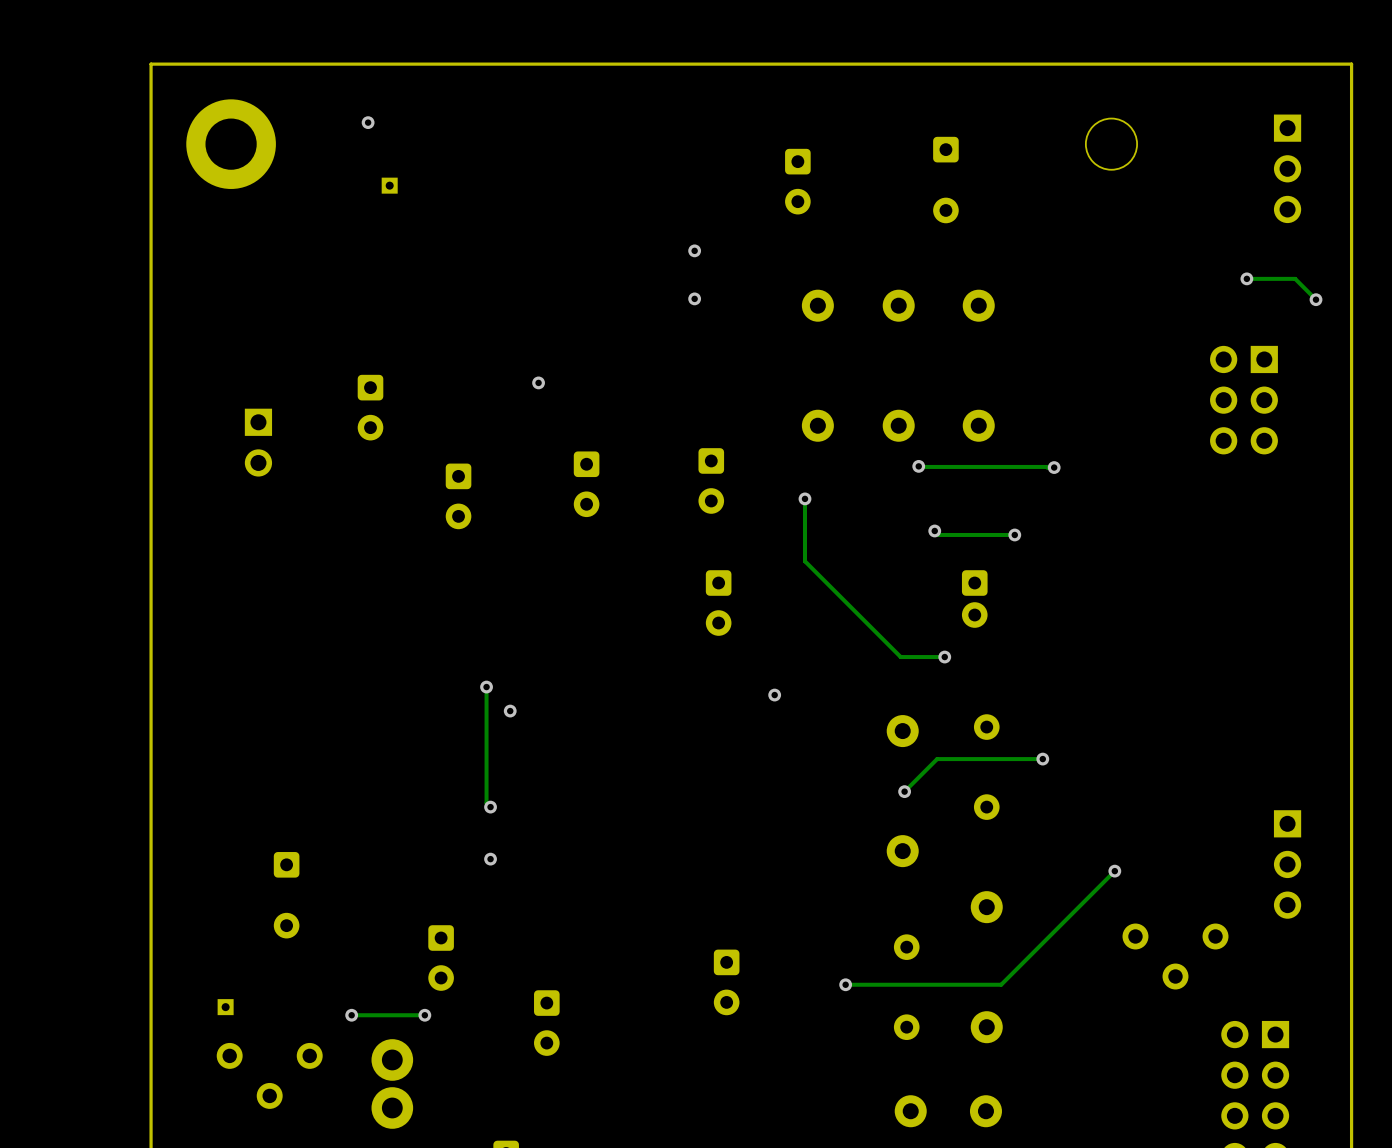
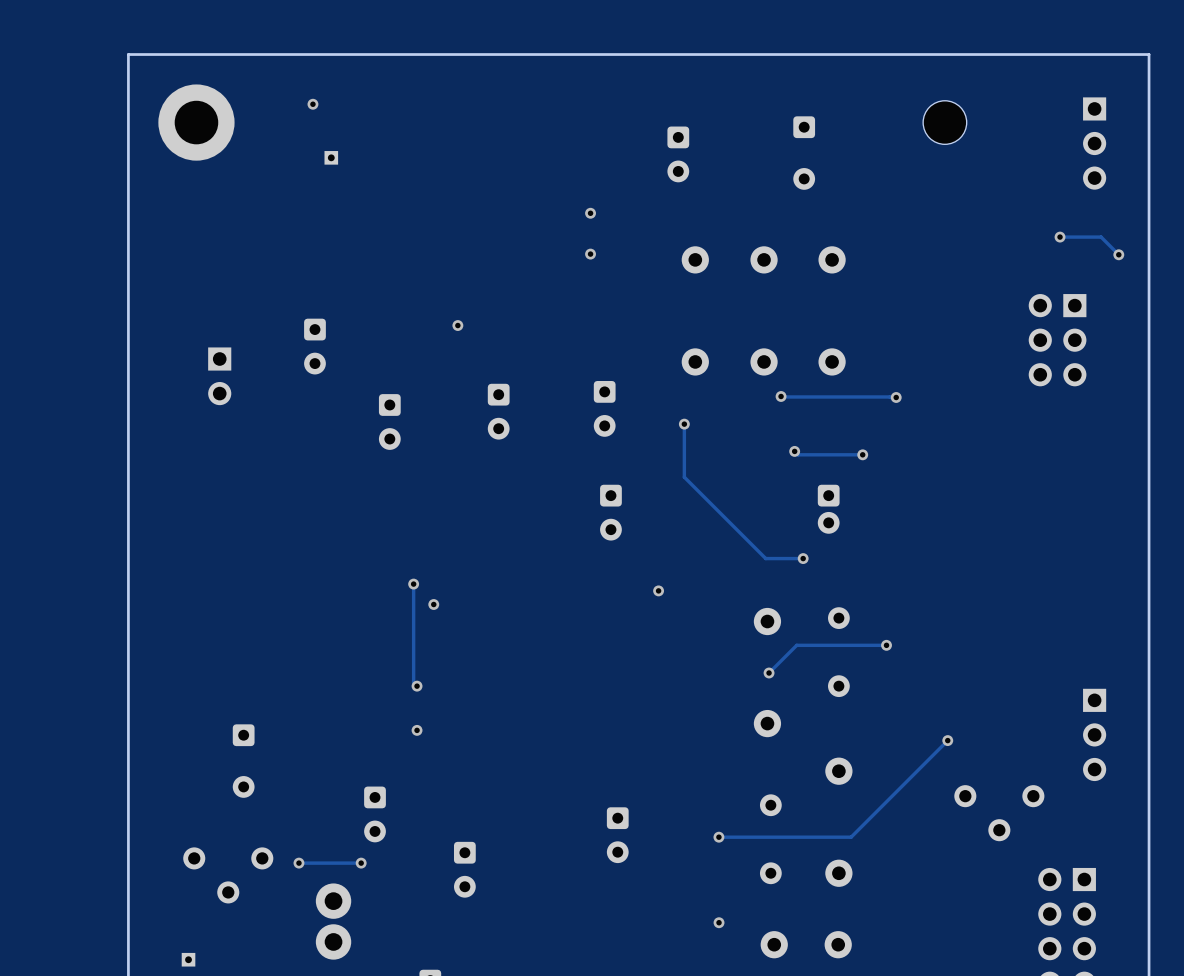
part position: (225, 1007) -> (188, 959)
part position: (269, 1075) -> (228, 875)
via: none -> (719, 922)

